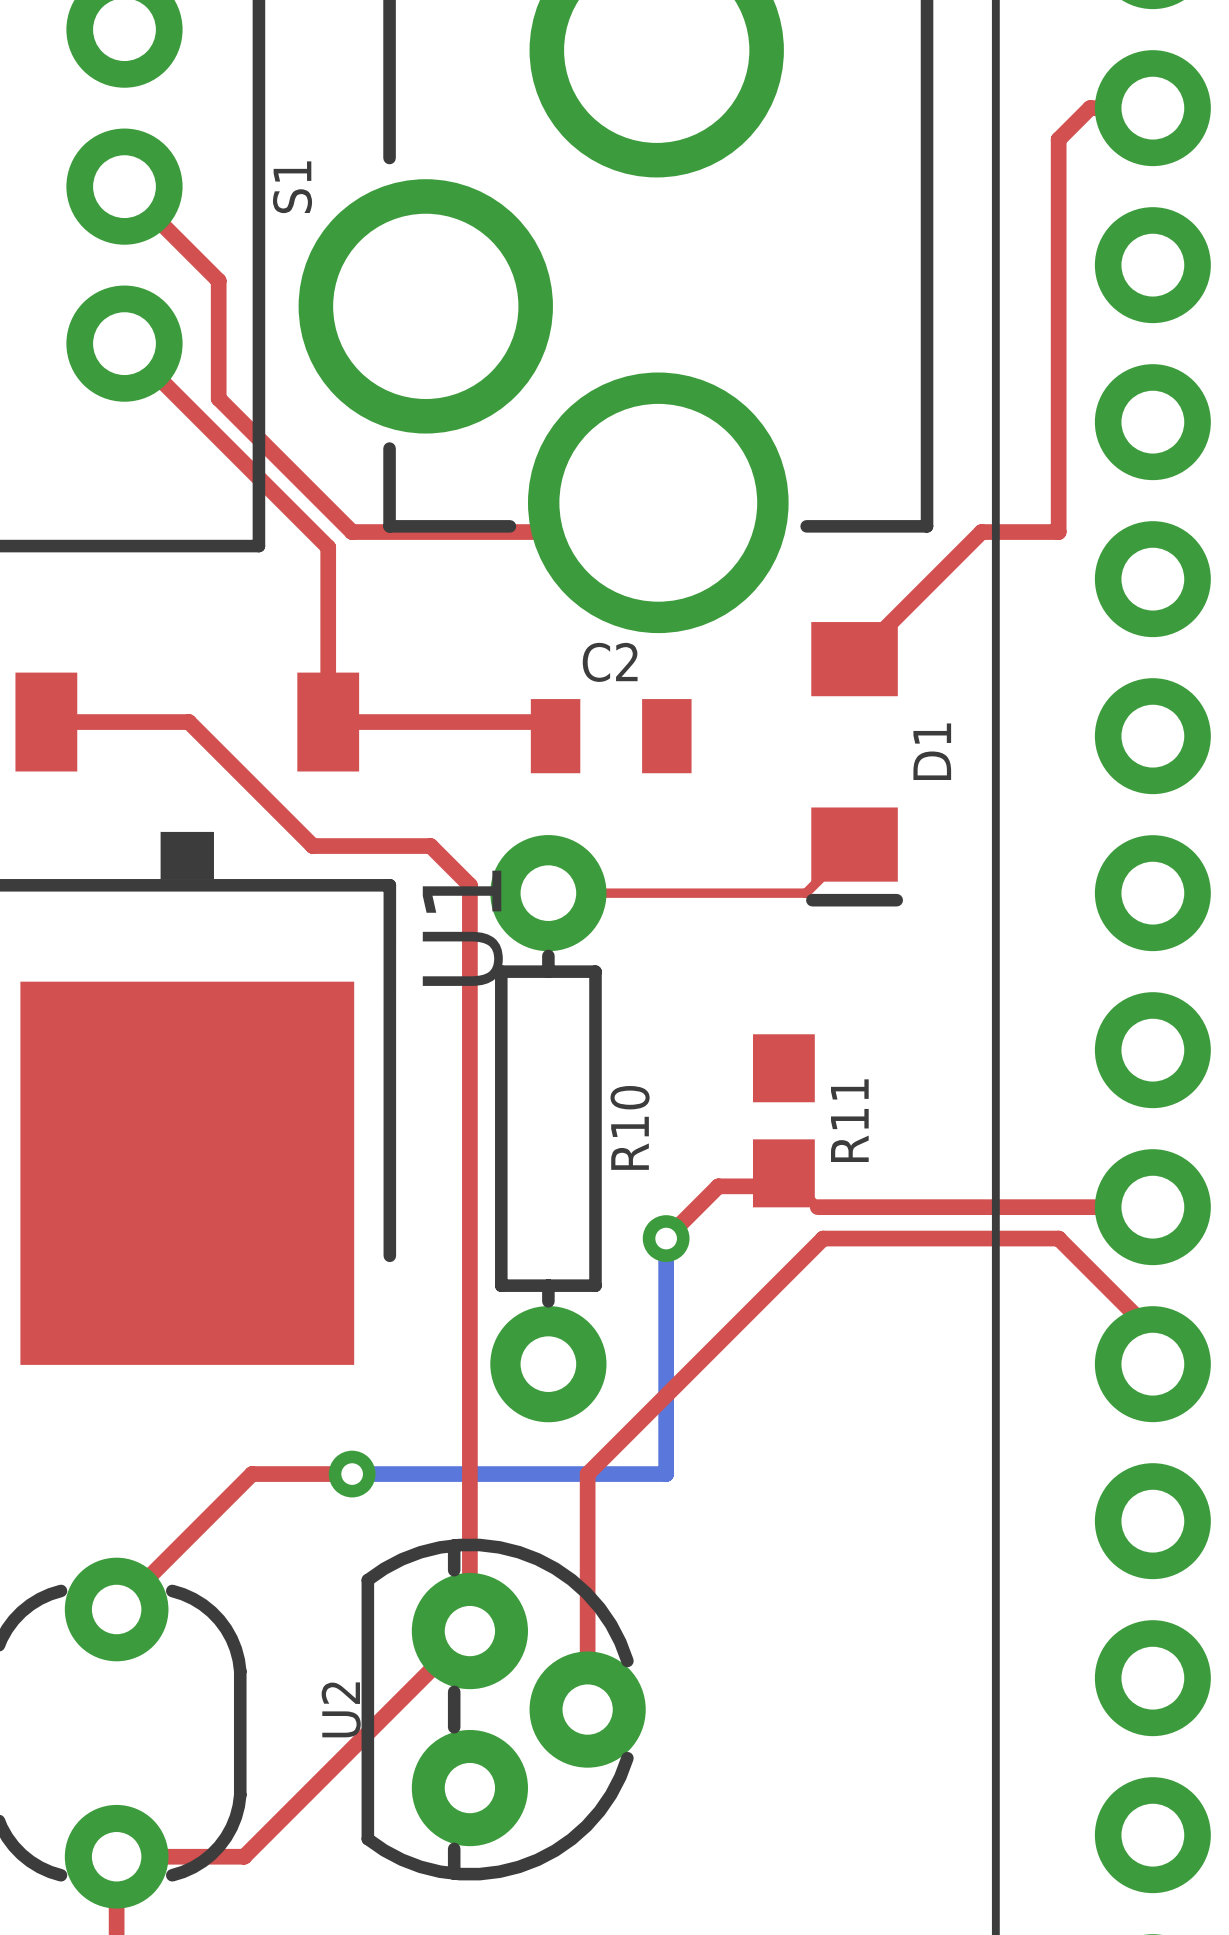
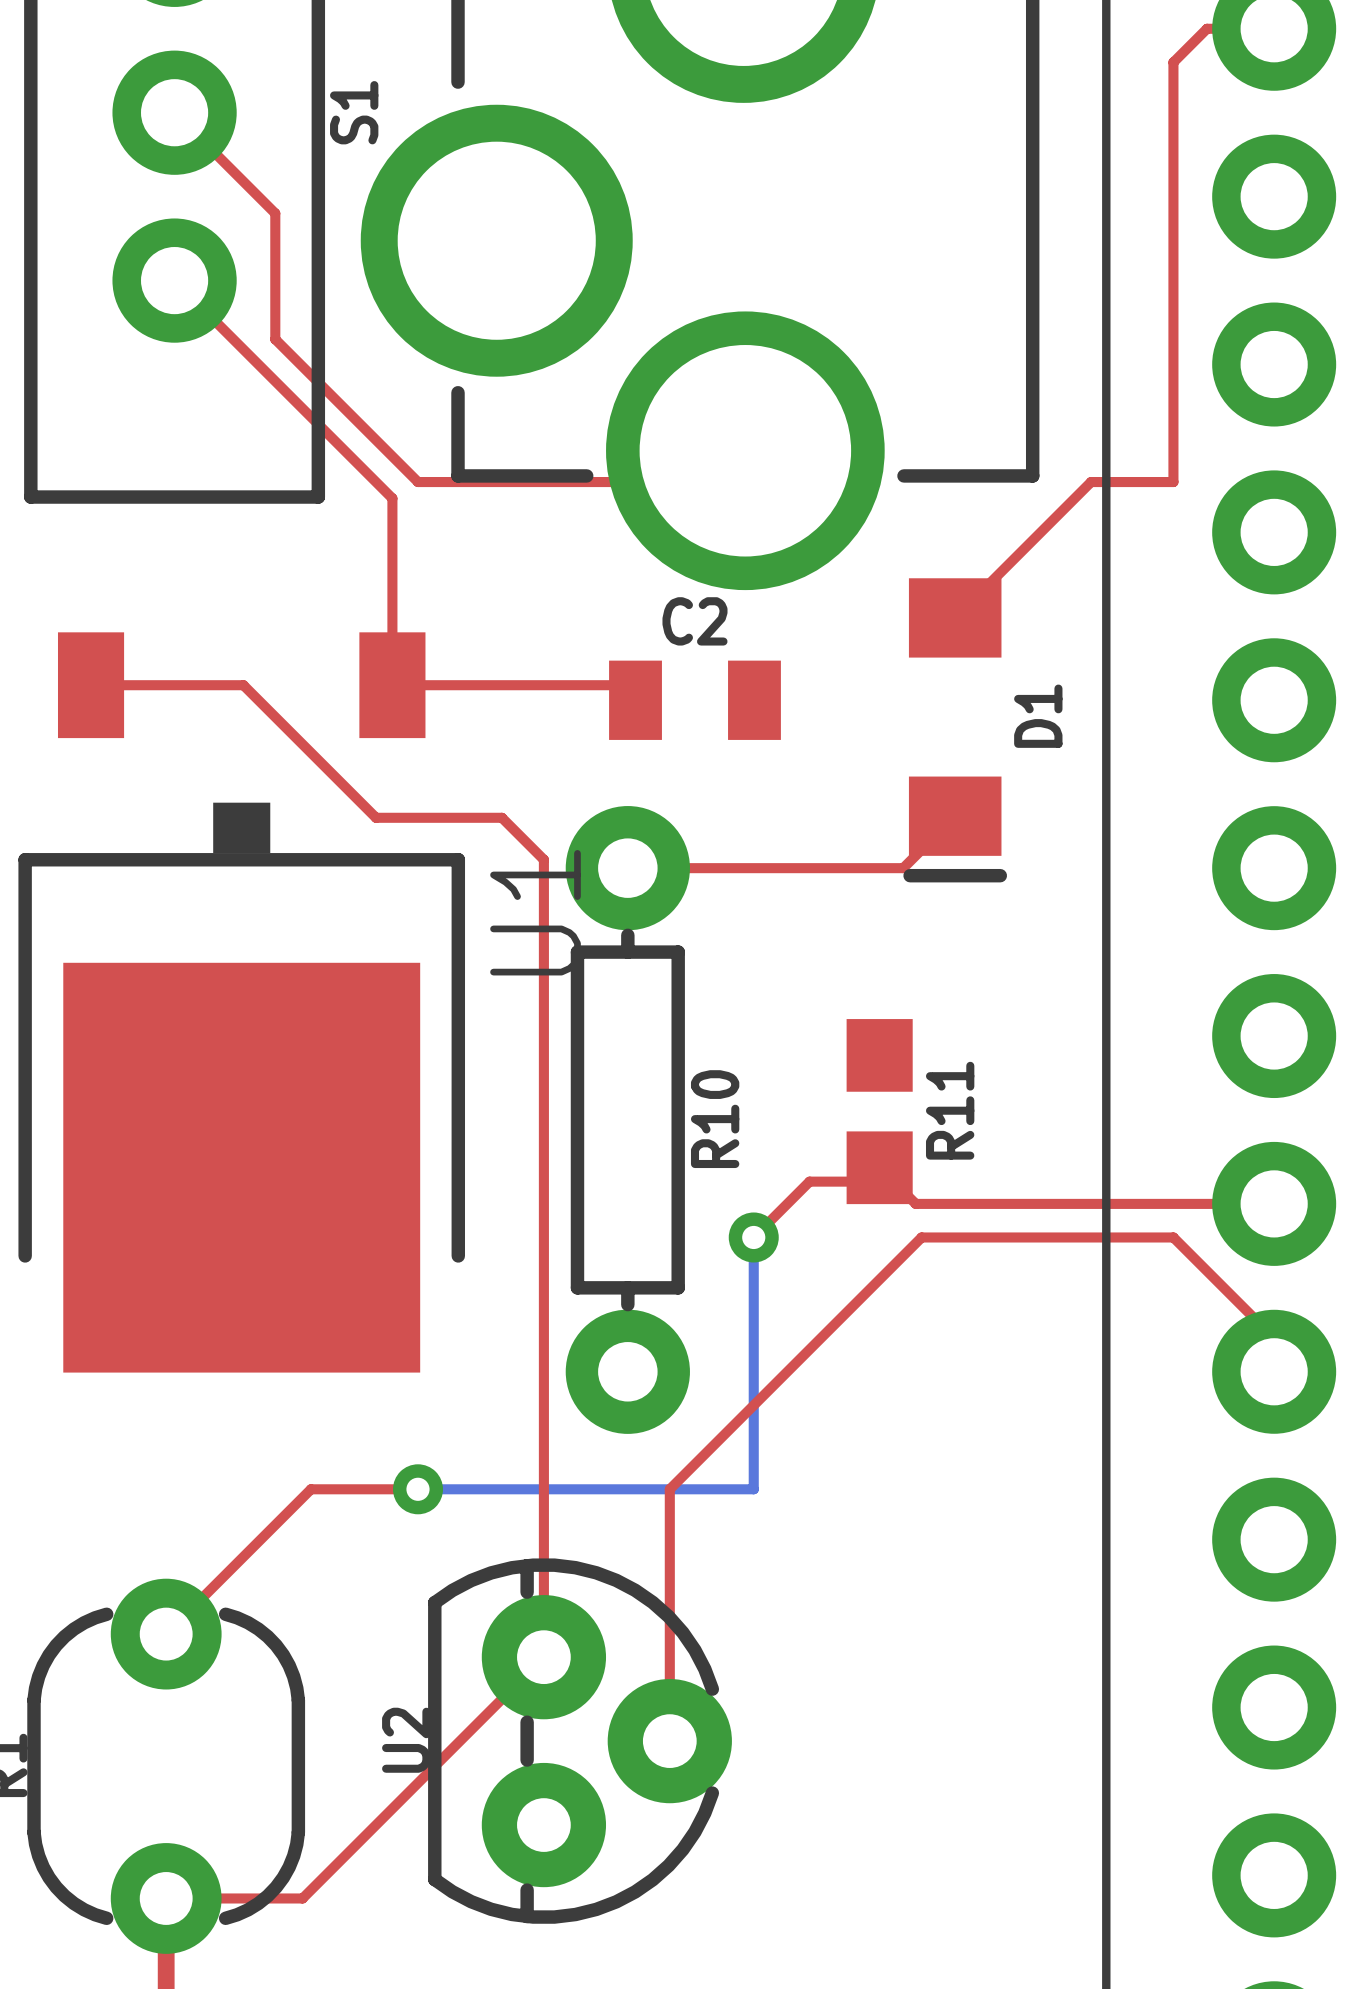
top track width: thick (1152, 108) (1090, 108) (1058, 139) (1058, 532) (981, 532) (854, 659) -> thin (1274, 28) (1207, 28) (1173, 62) (1173, 482) (1091, 482) (955, 617)
top track width: thick (124, 186) (218, 280) (218, 398) (352, 532) (629, 532) (658, 502) -> thin (174, 112) (275, 213) (275, 339) (418, 482) (714, 482) (745, 450)
top track width: thick (124, 343) (328, 547) (328, 722) (541, 722) -> thin (174, 280) (392, 498) (392, 685) (620, 685)
top track width: thick (46, 722) (188, 722) (312, 846) (430, 846) (469, 885) (469, 1631) (244, 1856) (116, 1856) -> thin (91, 685) (243, 685) (376, 817) (501, 817) (543, 859) (543, 1657) (302, 1898) (166, 1898)
top track width: thick (796, 1186) (718, 1186) (666, 1238) -> thin (893, 1181) (809, 1181) (753, 1237)
top track width: thick (817, 1207) (1152, 1207) -> thin (915, 1203) (1274, 1203)
bottom track width: thick (666, 1238) (666, 1474) (352, 1474) -> thin (753, 1237) (753, 1489) (418, 1489)
top track width: thick (1152, 1364) (1152, 1332) (1058, 1238) (823, 1238) (587, 1474) (587, 1709) -> thin (1274, 1371) (1274, 1338) (1173, 1237) (921, 1237) (669, 1489) (669, 1741)
top track width: thick (352, 1474) (252, 1474) (116, 1609) -> thin (418, 1489) (310, 1489) (166, 1634)

